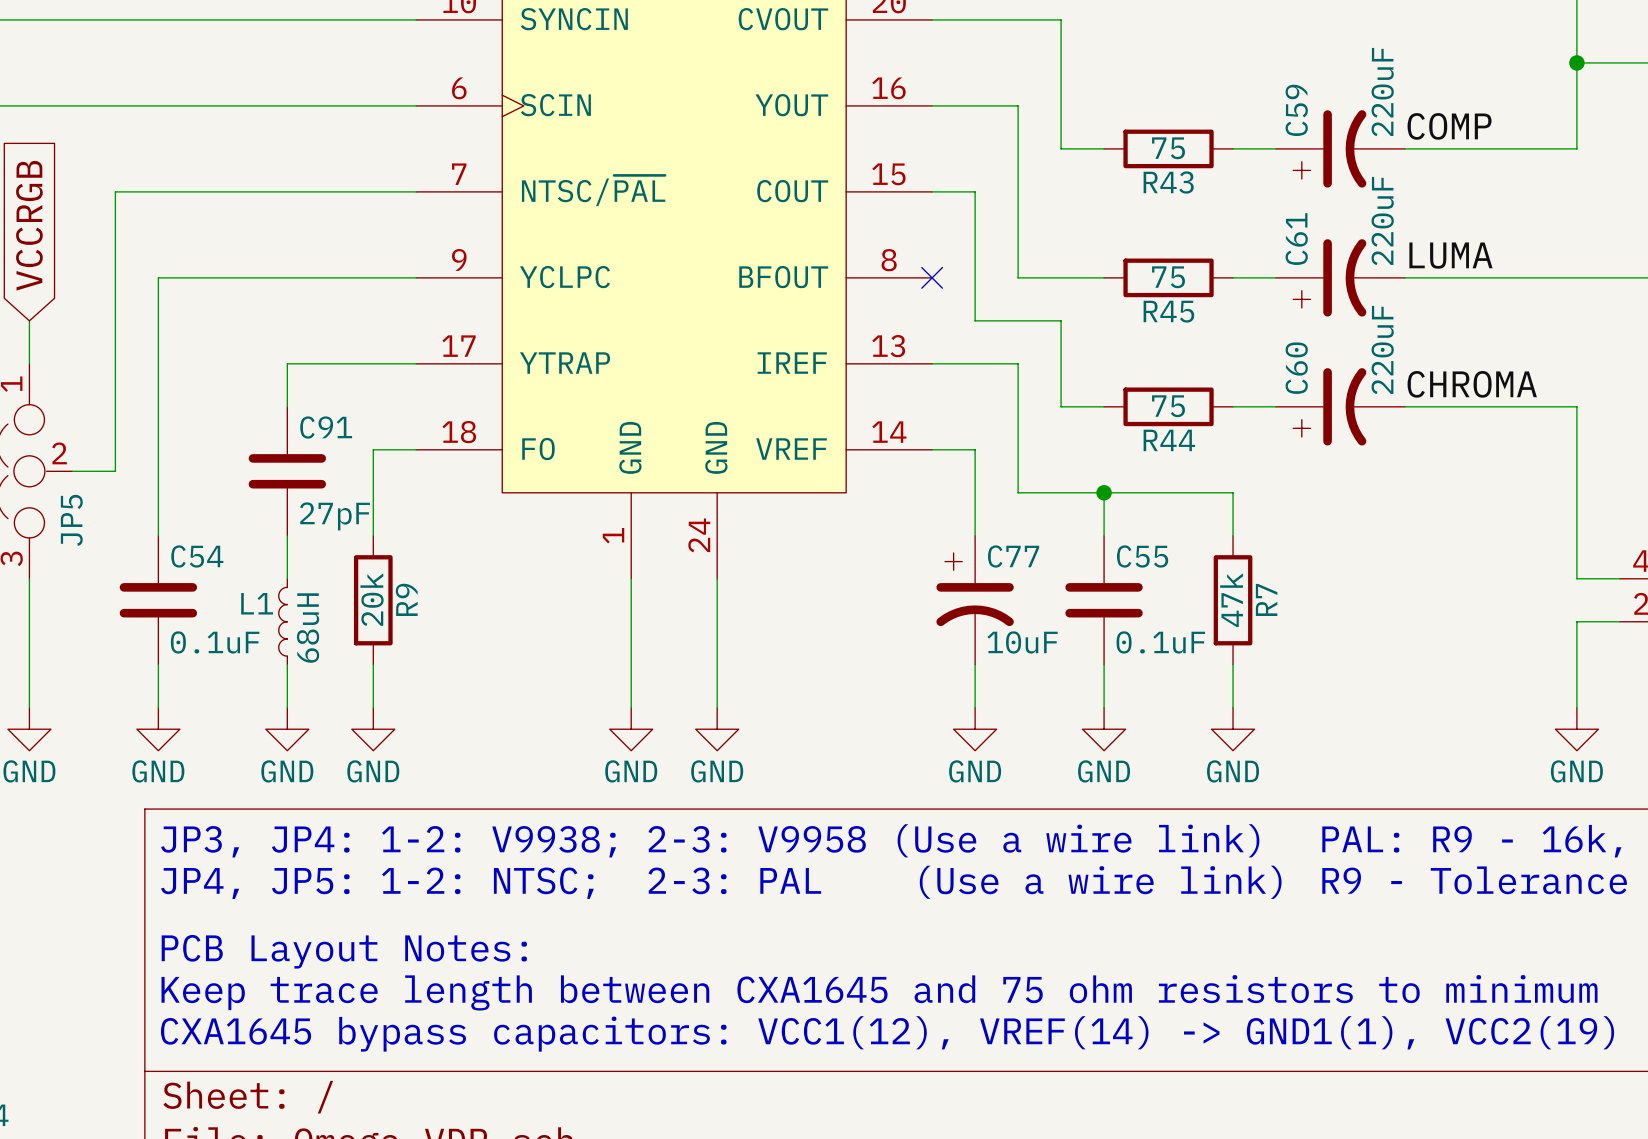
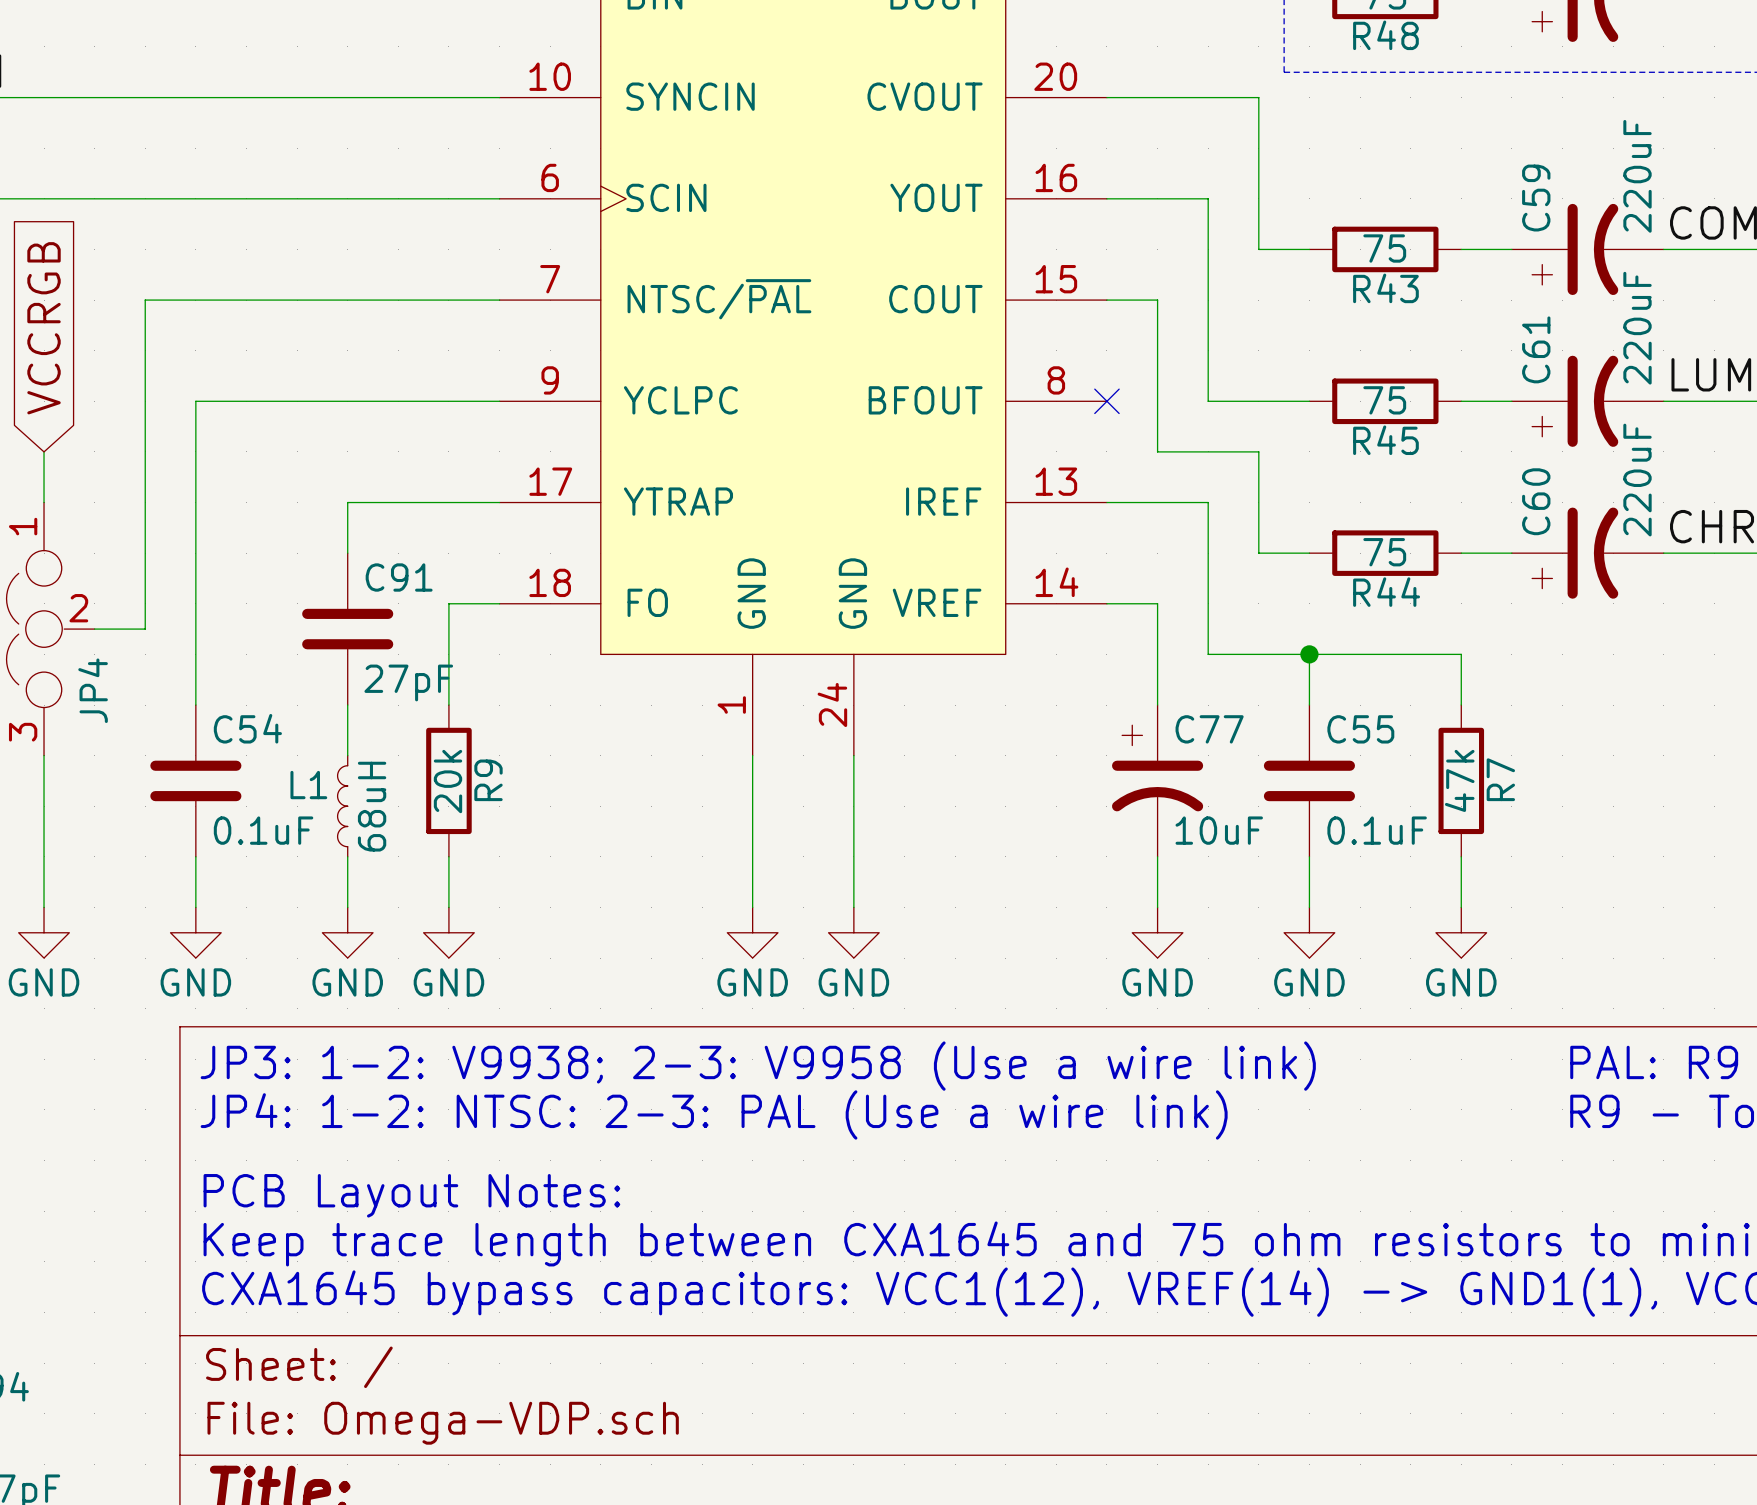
JP5 name: JP5 (71, 520) -> JP4 (93, 690)
text: JP3, JP4: 1-2: V9938; 2-3: V9958 (Use a wire link) (710, 840) -> JP3: 1-2: V9938; 2-3: V9958 (Use a wire link) (758, 1066)
text: JP4, JP5: 1-2: NTSC; 2-3: PAL (Use a wire link) (721, 882) -> JP4: 1-2: NTSC: 2-3: PAL (Use a wire link) (714, 1114)

